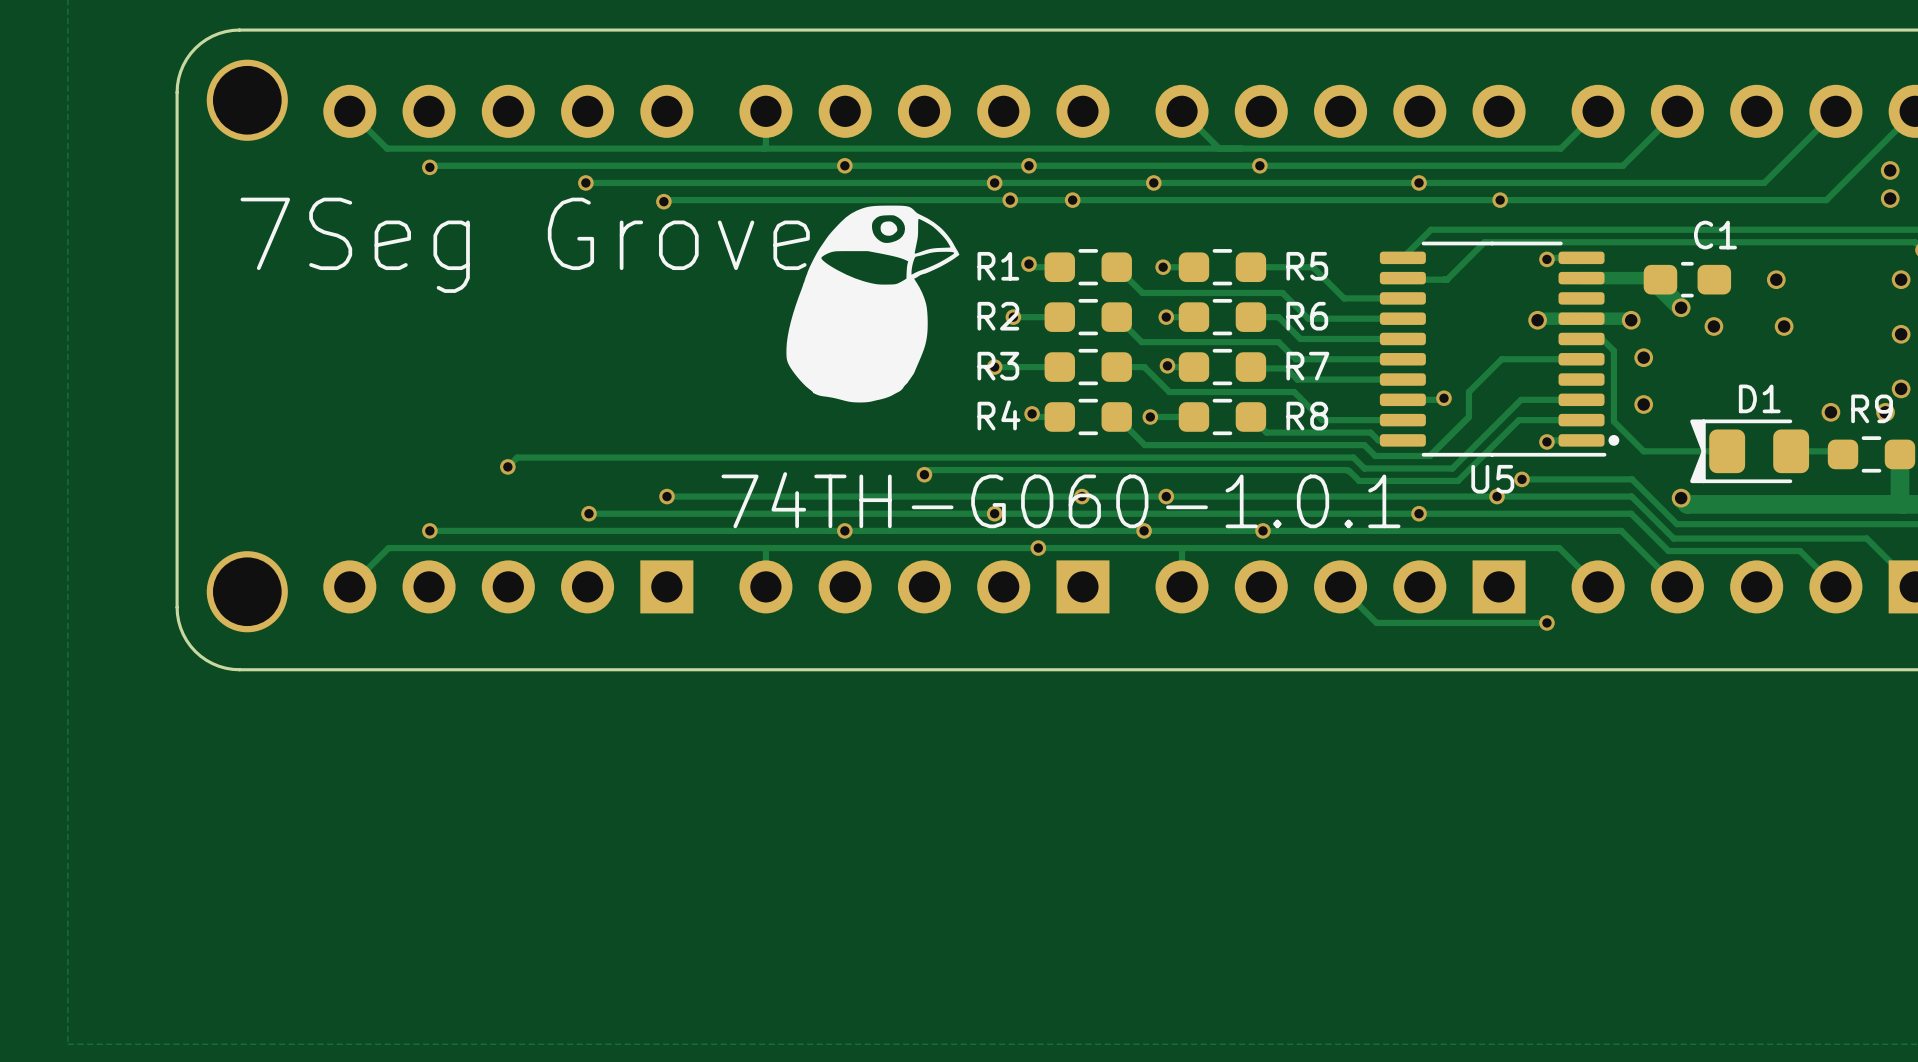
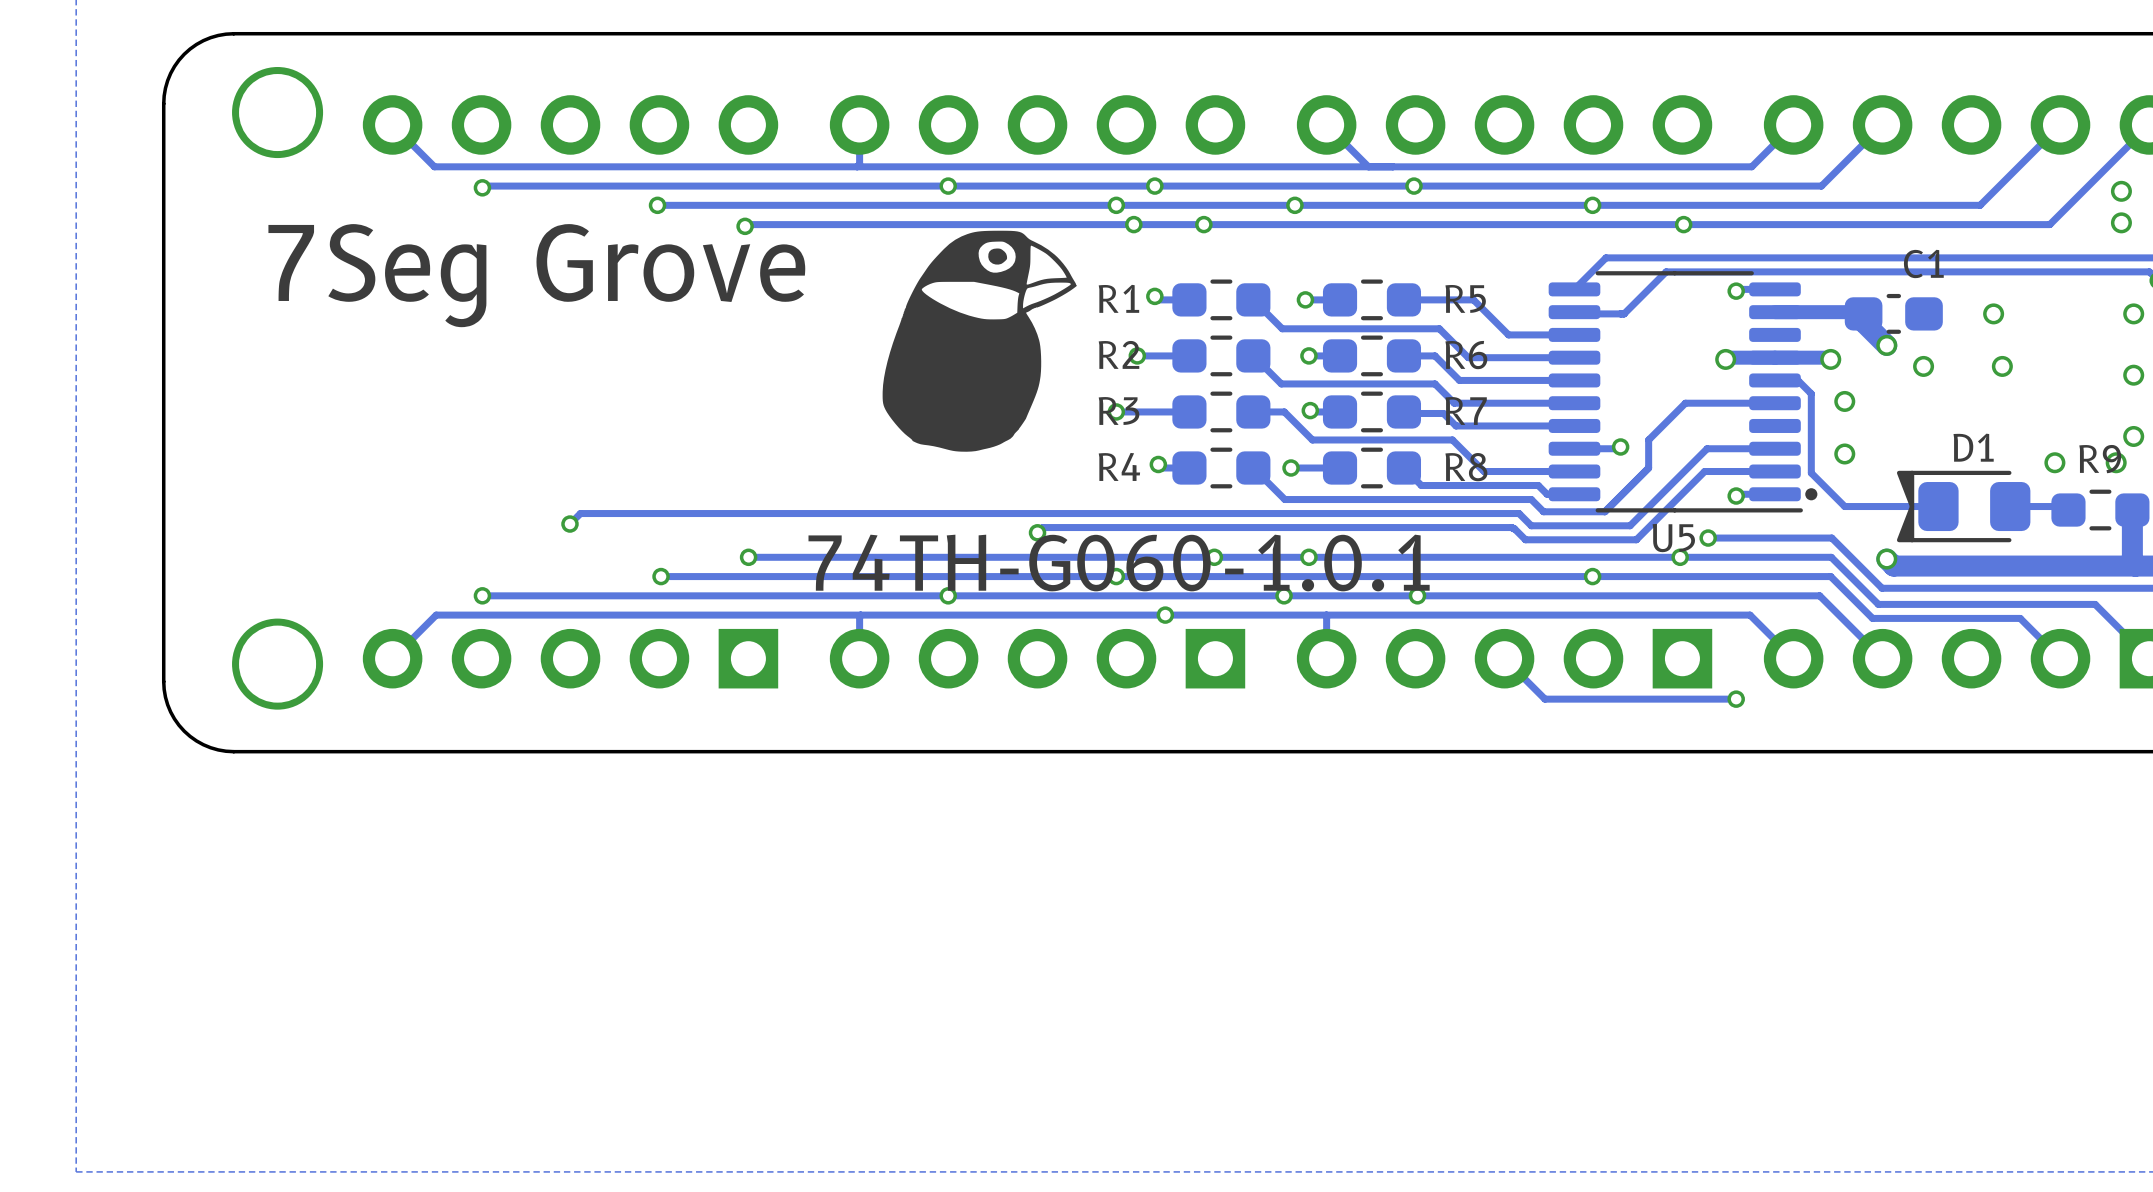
board edge: (239, 30) (225, 31) (212, 36) (195, 48) (183, 65) (178, 78) (177, 92) (177, 614) (183, 634) (190, 646) (200, 656) (218, 666) (239, 669) -> (268, 33) (225, 34) (210, 37) (196, 44) (184, 54) (170, 73) (165, 88) (163, 103) (164, 689) (167, 704) (174, 718) (184, 731) (196, 740) (210, 747) (225, 751) (268, 751)

